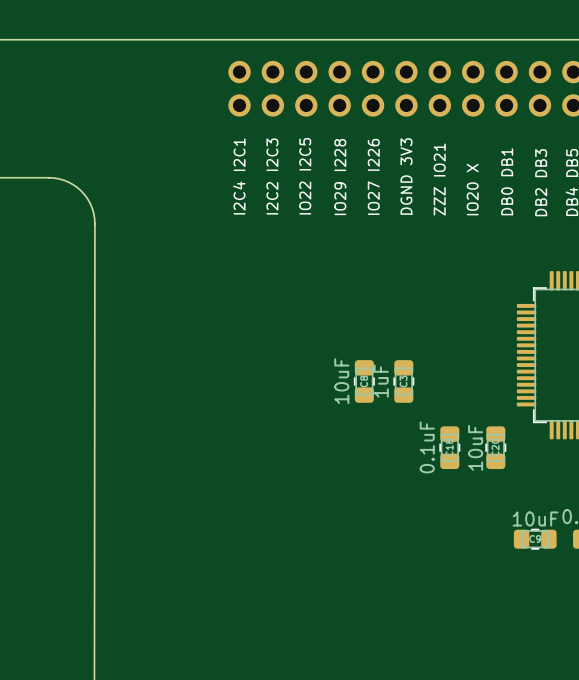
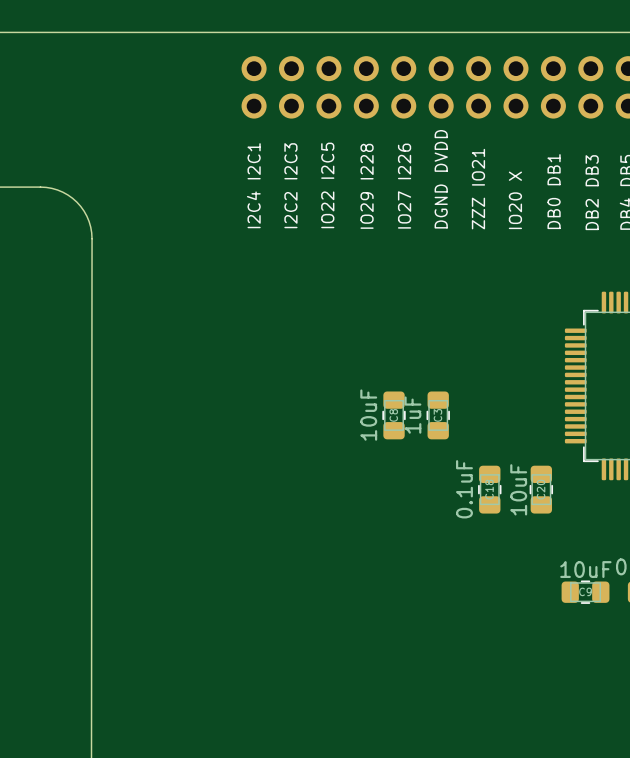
text: DGND 3V3 (406, 176) -> DGND DVDD (441, 179)

